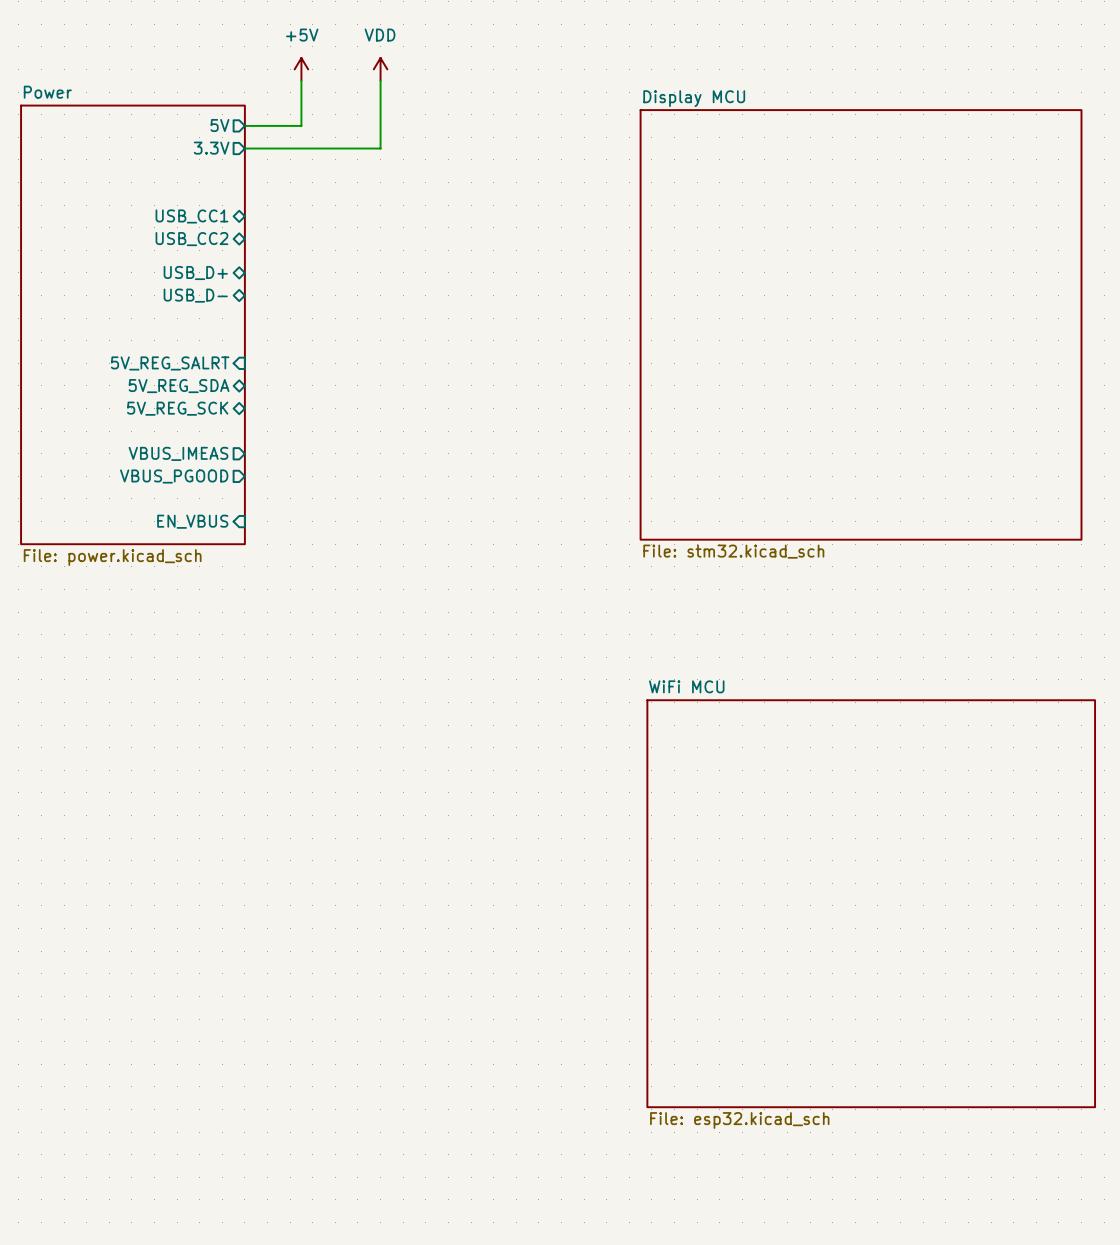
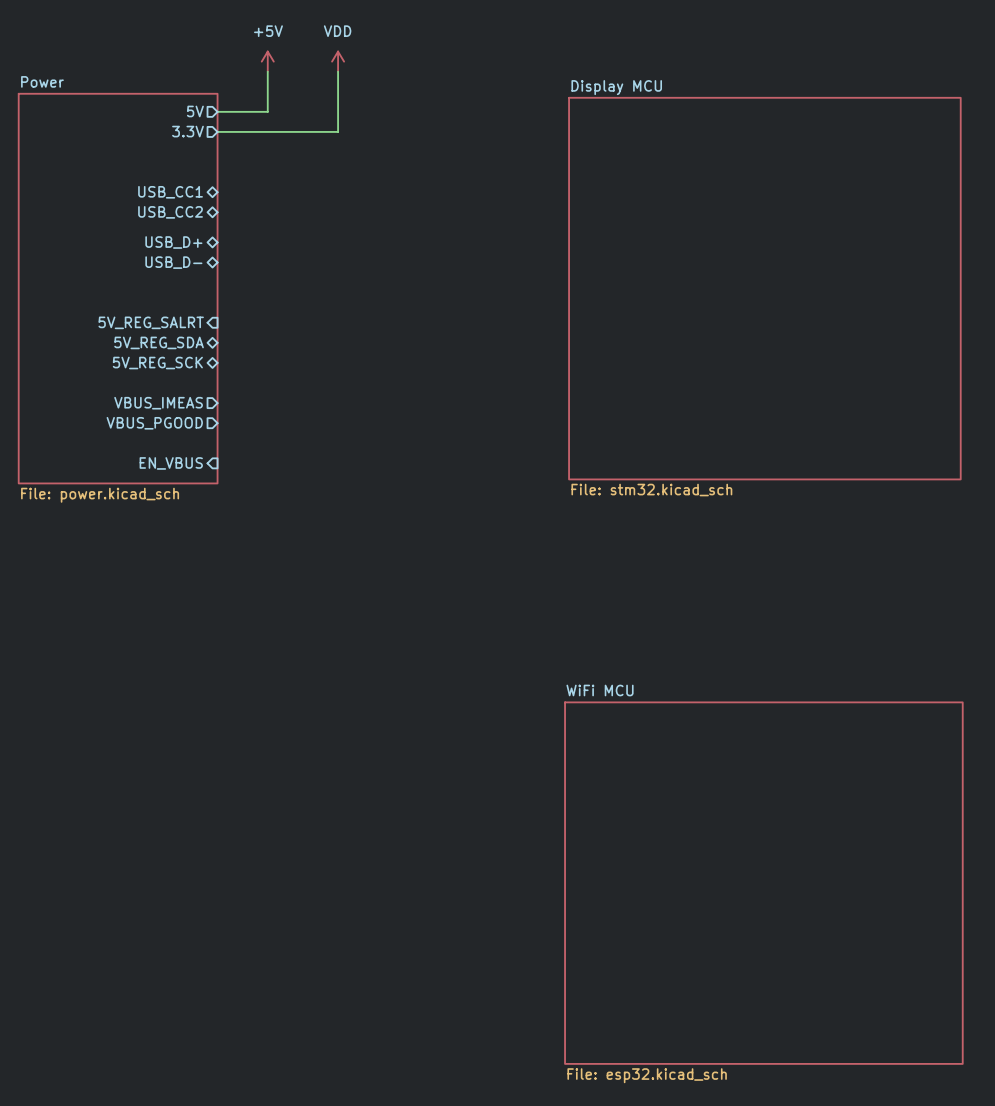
sheet WiFi MCU position: (871, 903) -> (763, 883)

